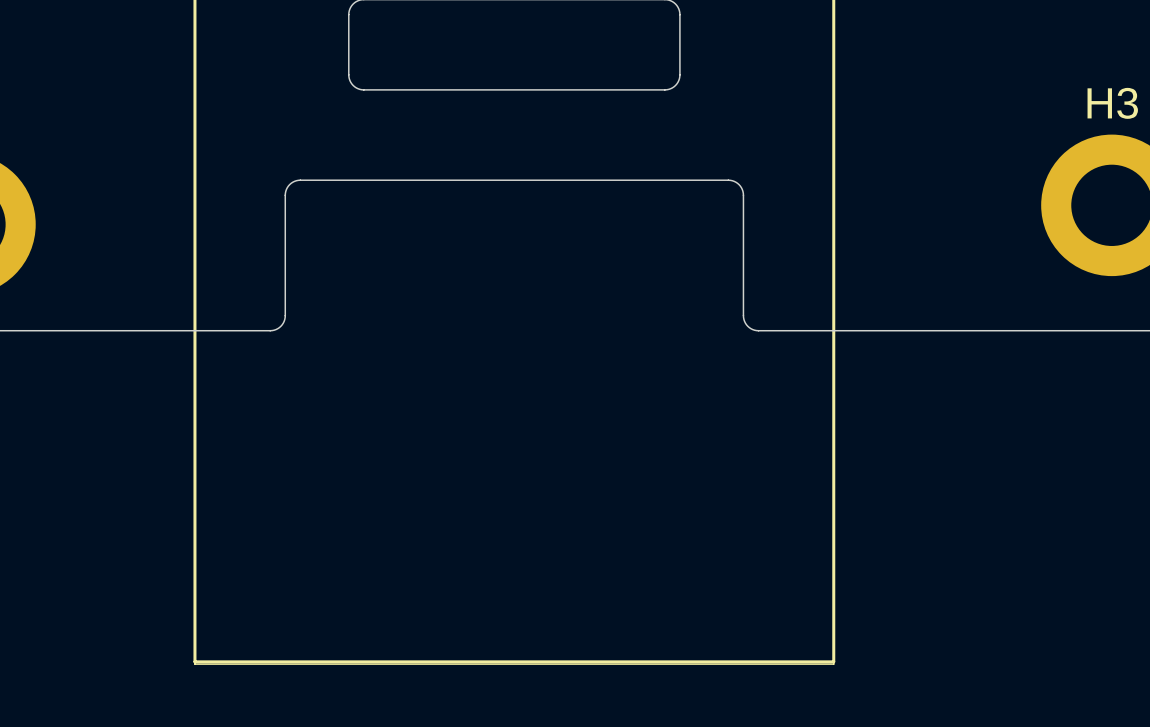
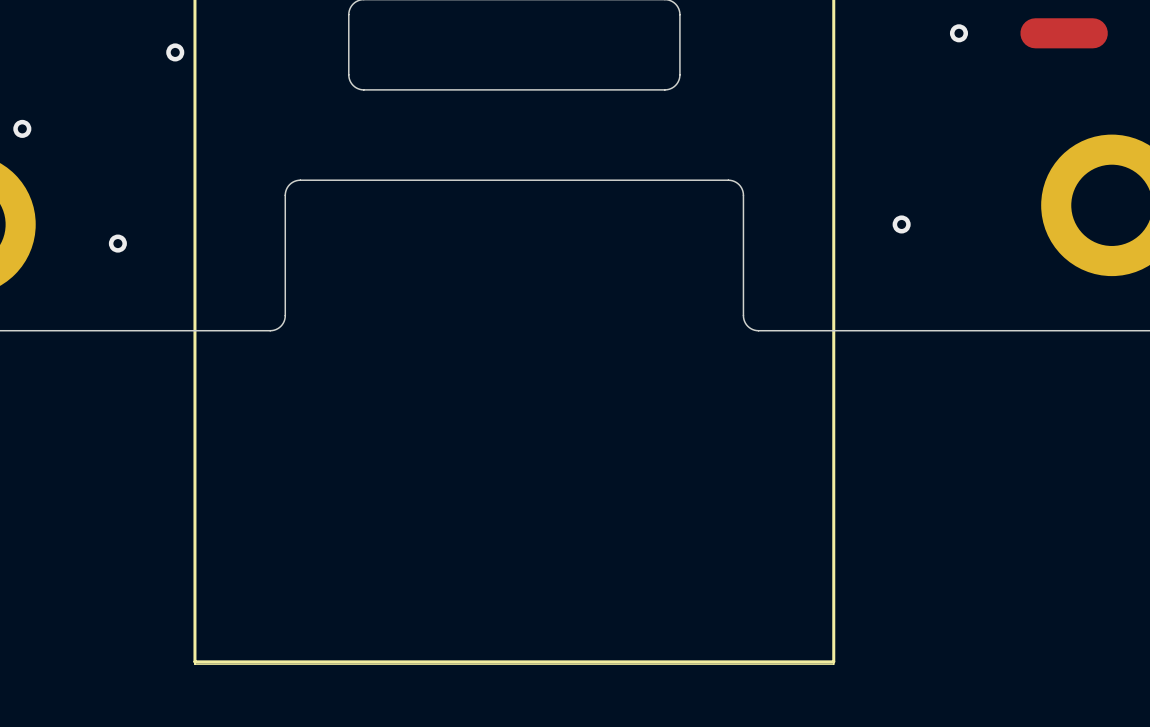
via: none -> (958, 33)
track: none -> (1035, 33) (1092, 33)
via: none -> (175, 52)
H3 name: H3 (1112, 103) -> none
via: none -> (22, 128)
via: none -> (901, 224)
via: none -> (117, 243)

